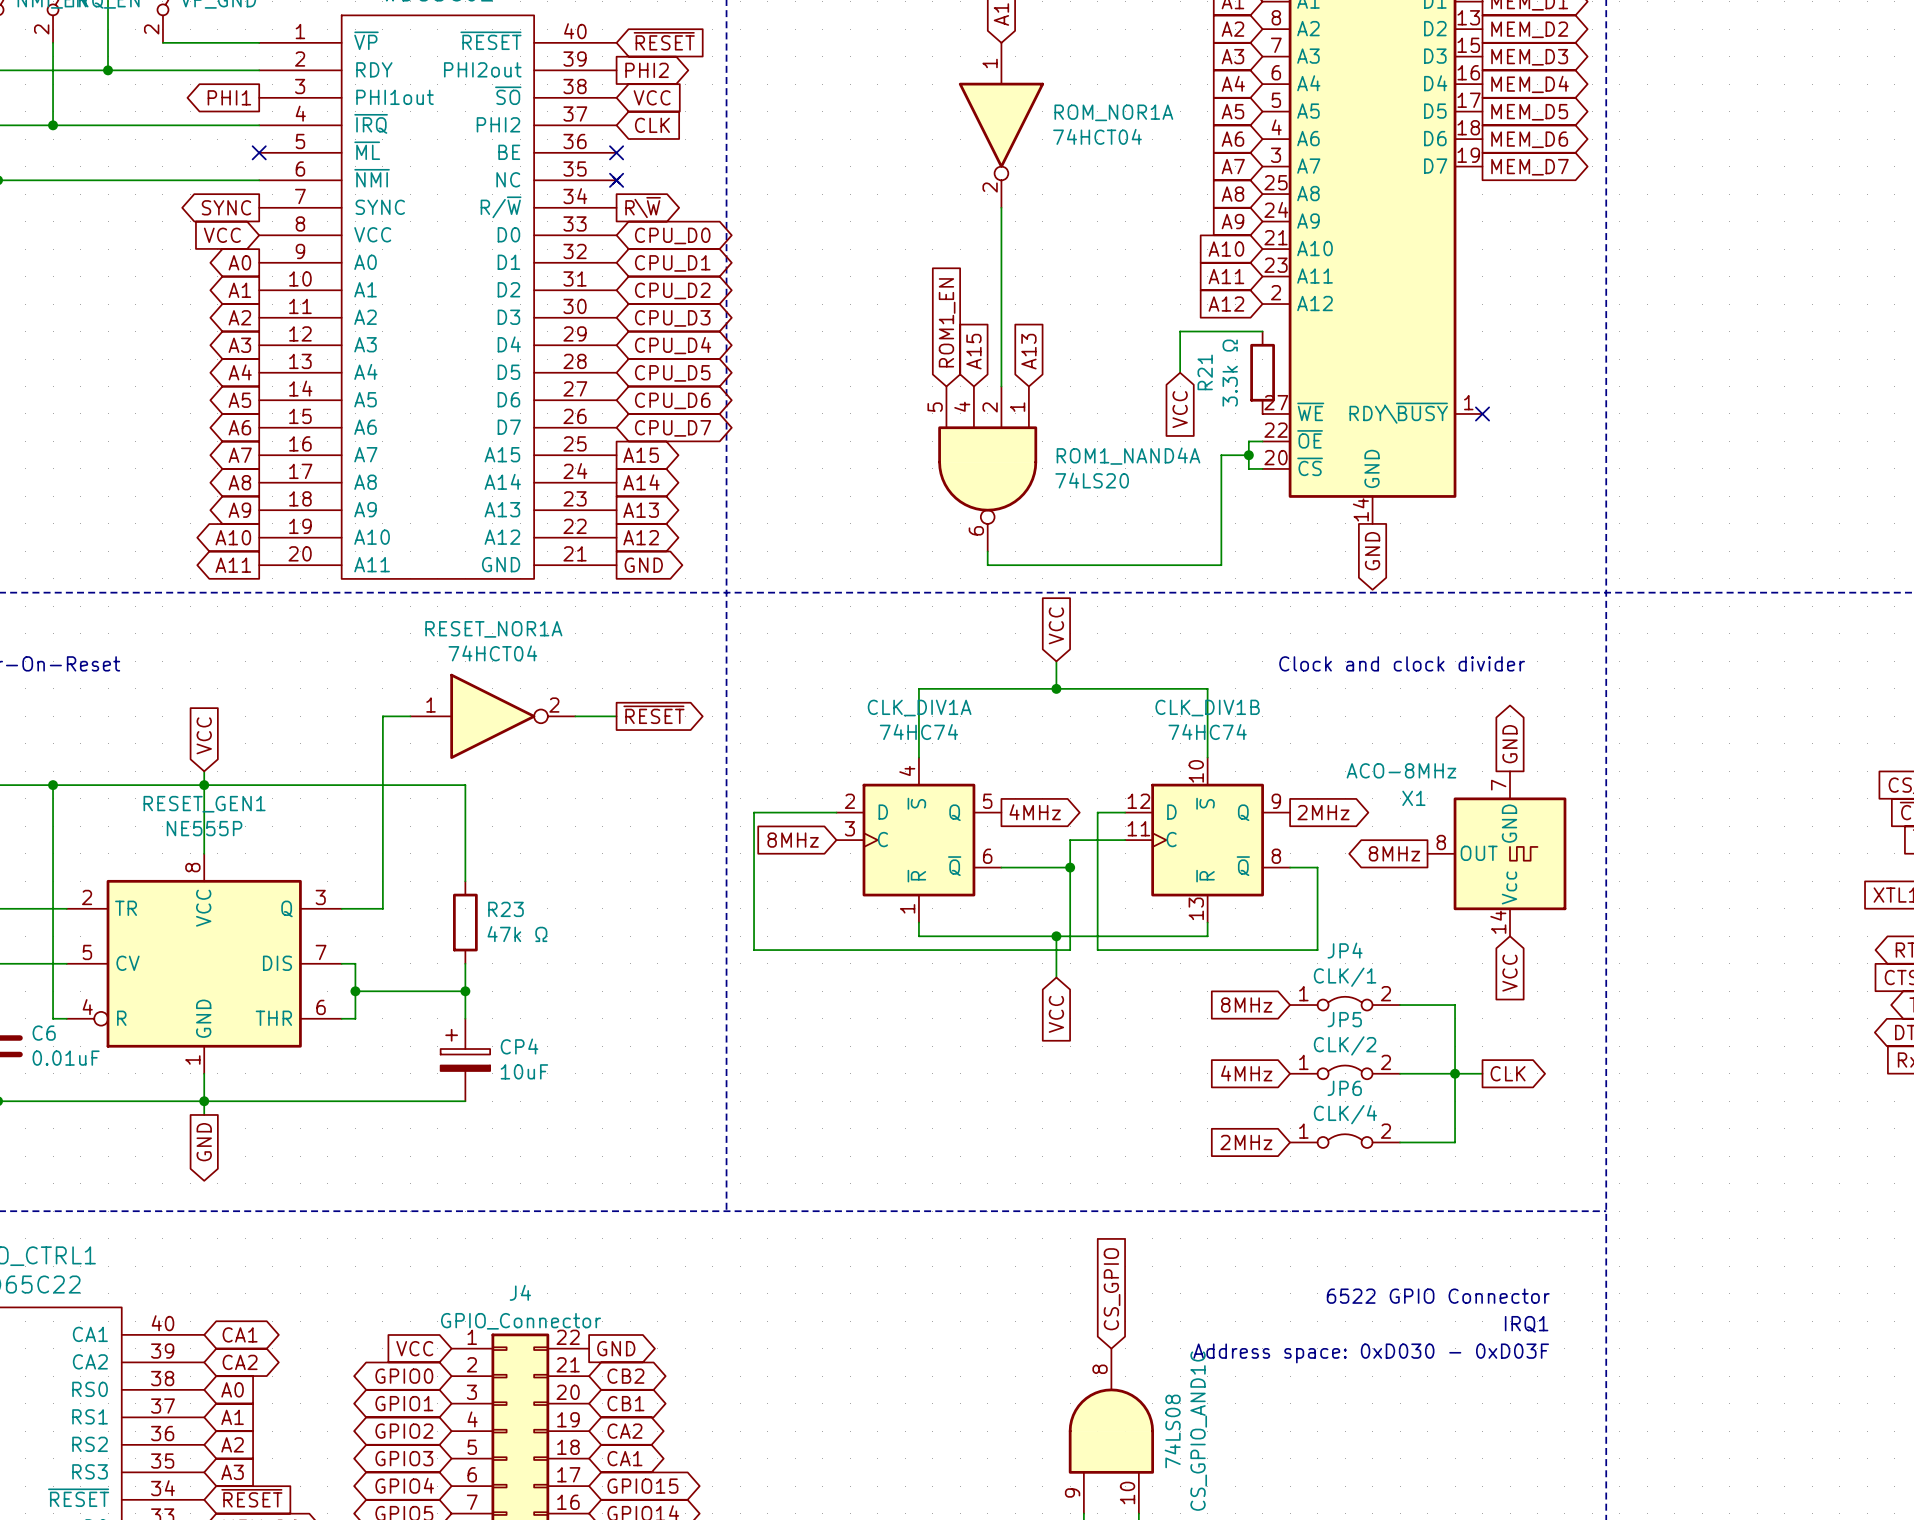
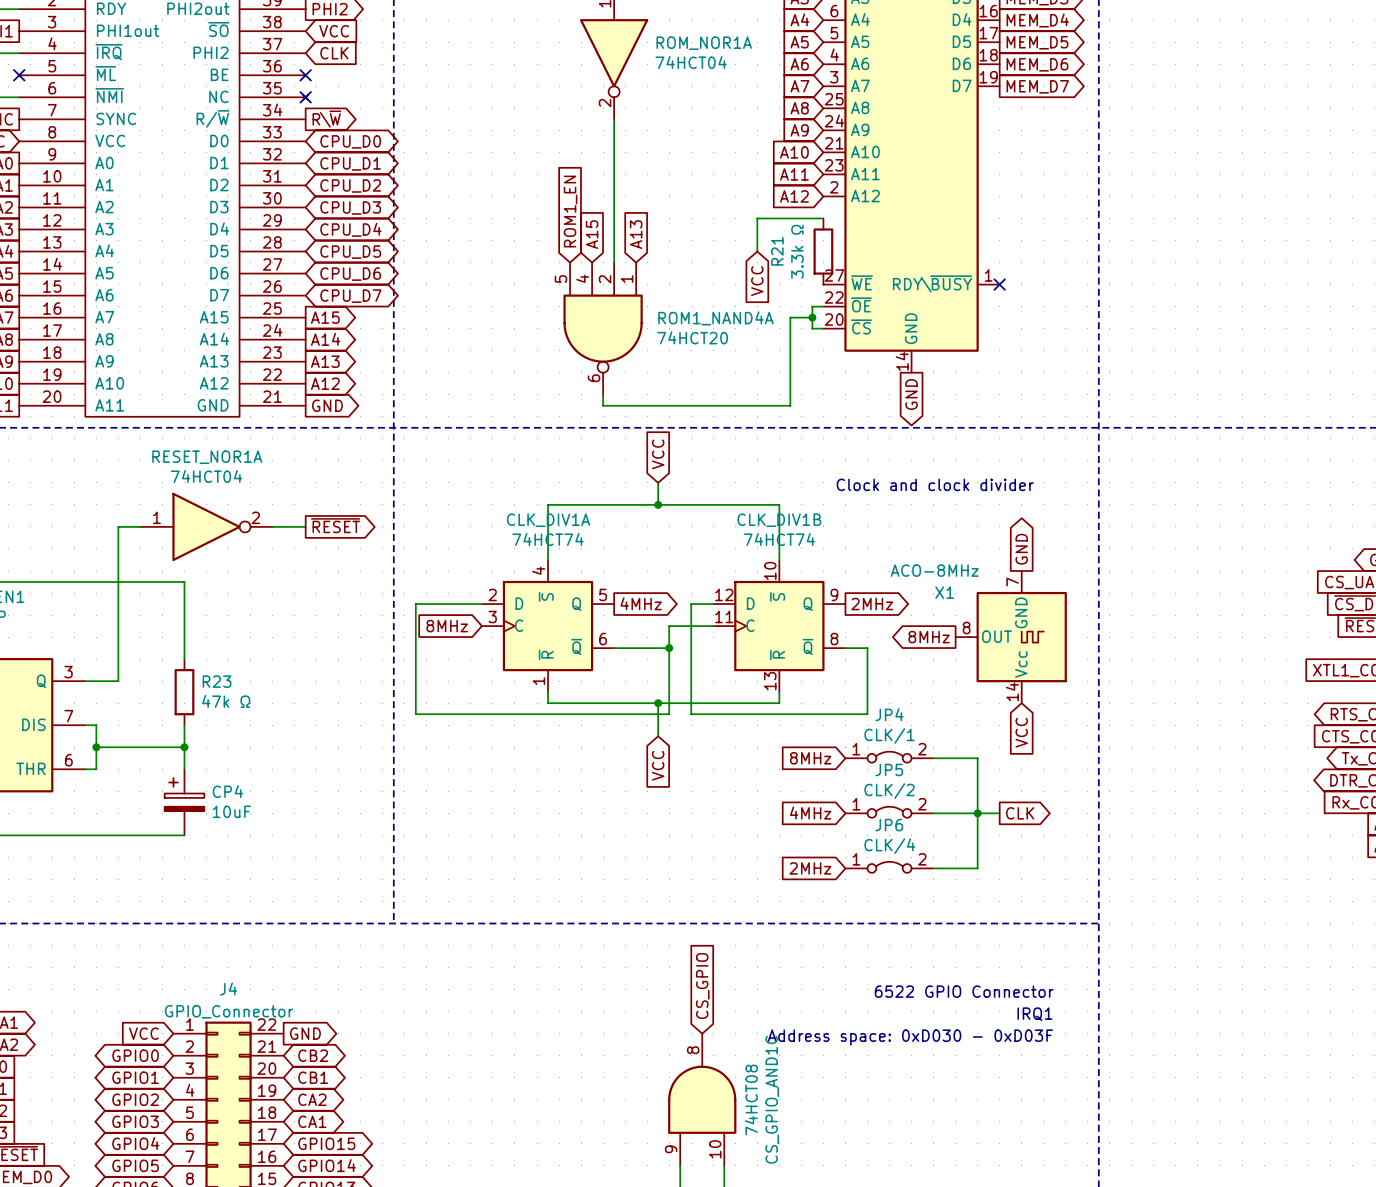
ROM1_NAND4A value: 74LS20 (1092, 480) -> 74HCT20 (692, 337)
CLK_DIV1A value: 74HC74 (918, 732) -> 74HCT74 (548, 539)
CLK_DIV1B value: 74HC74 (1207, 732) -> 74HCT74 (779, 539)
CS_GPIO_AND1C value: 74LS08 (1172, 1431) -> 74HCT08 (751, 1100)

